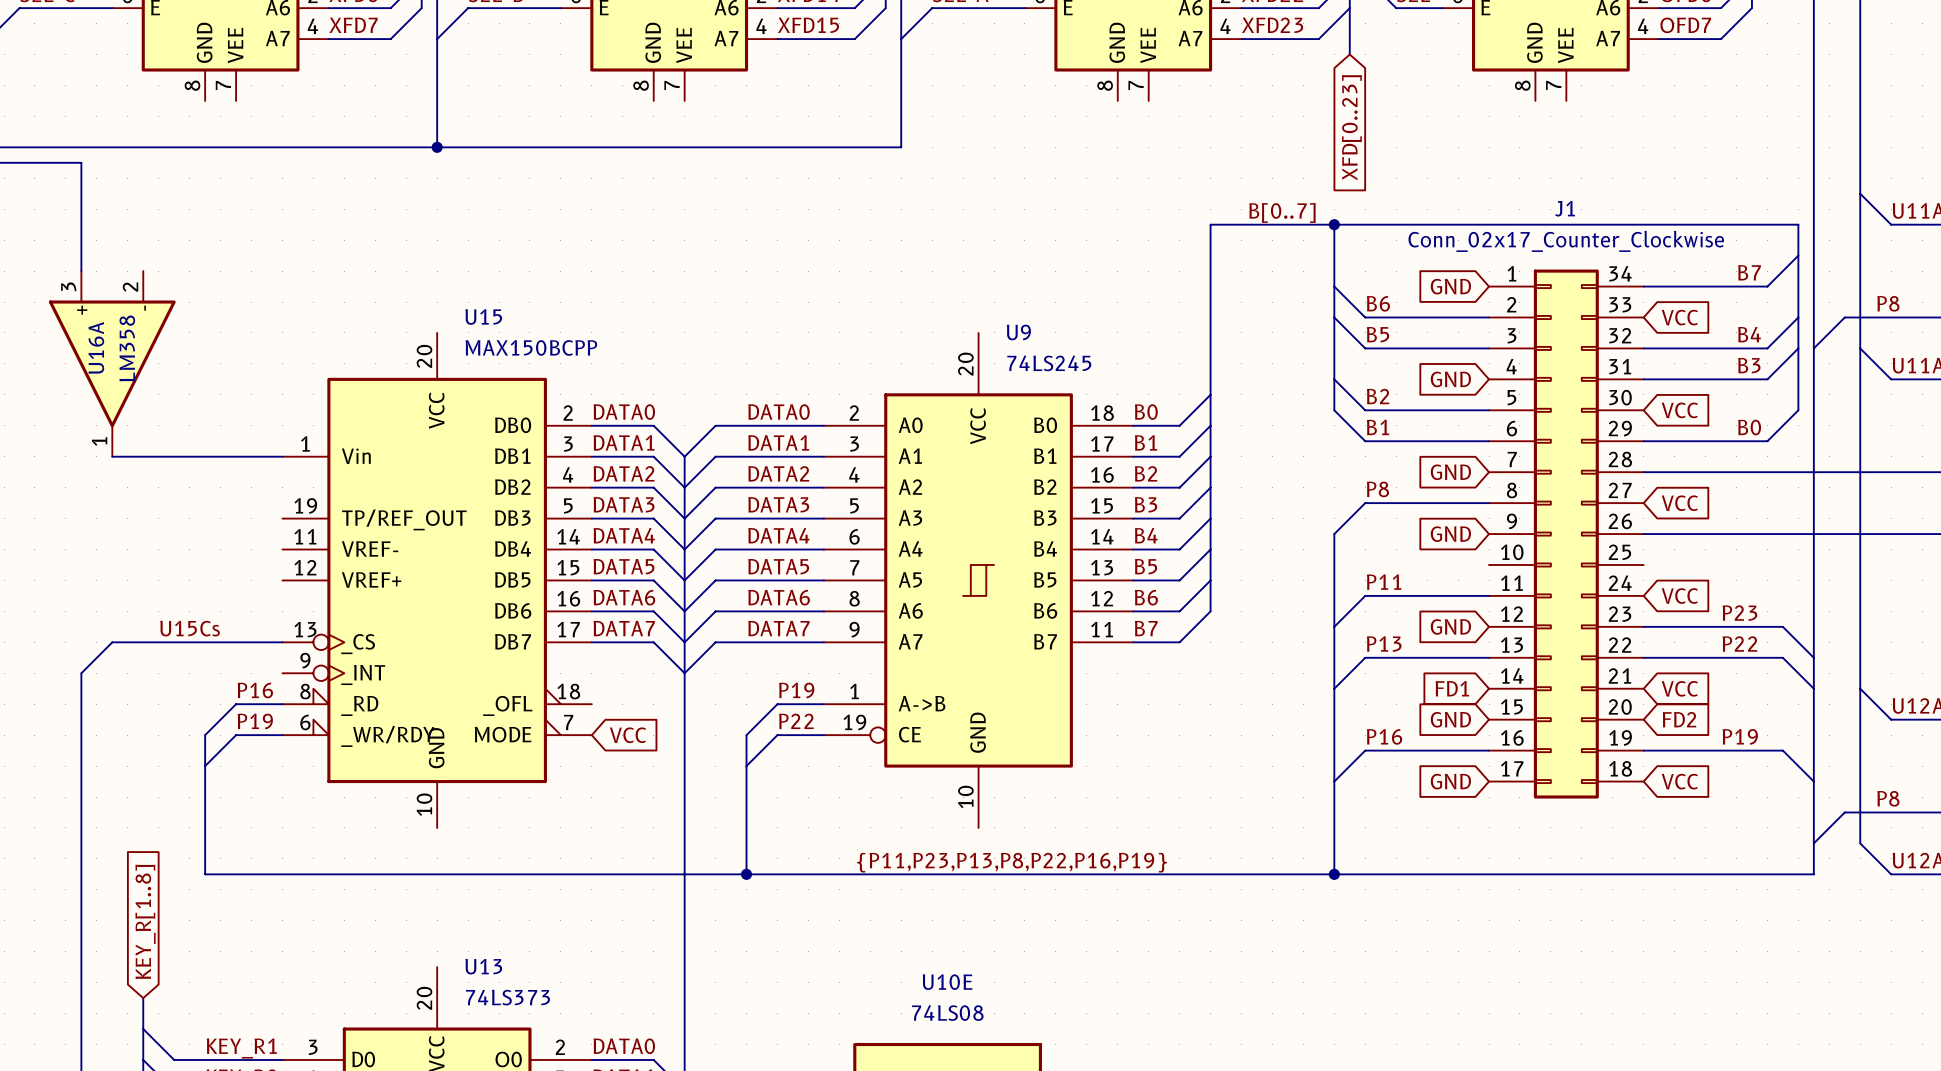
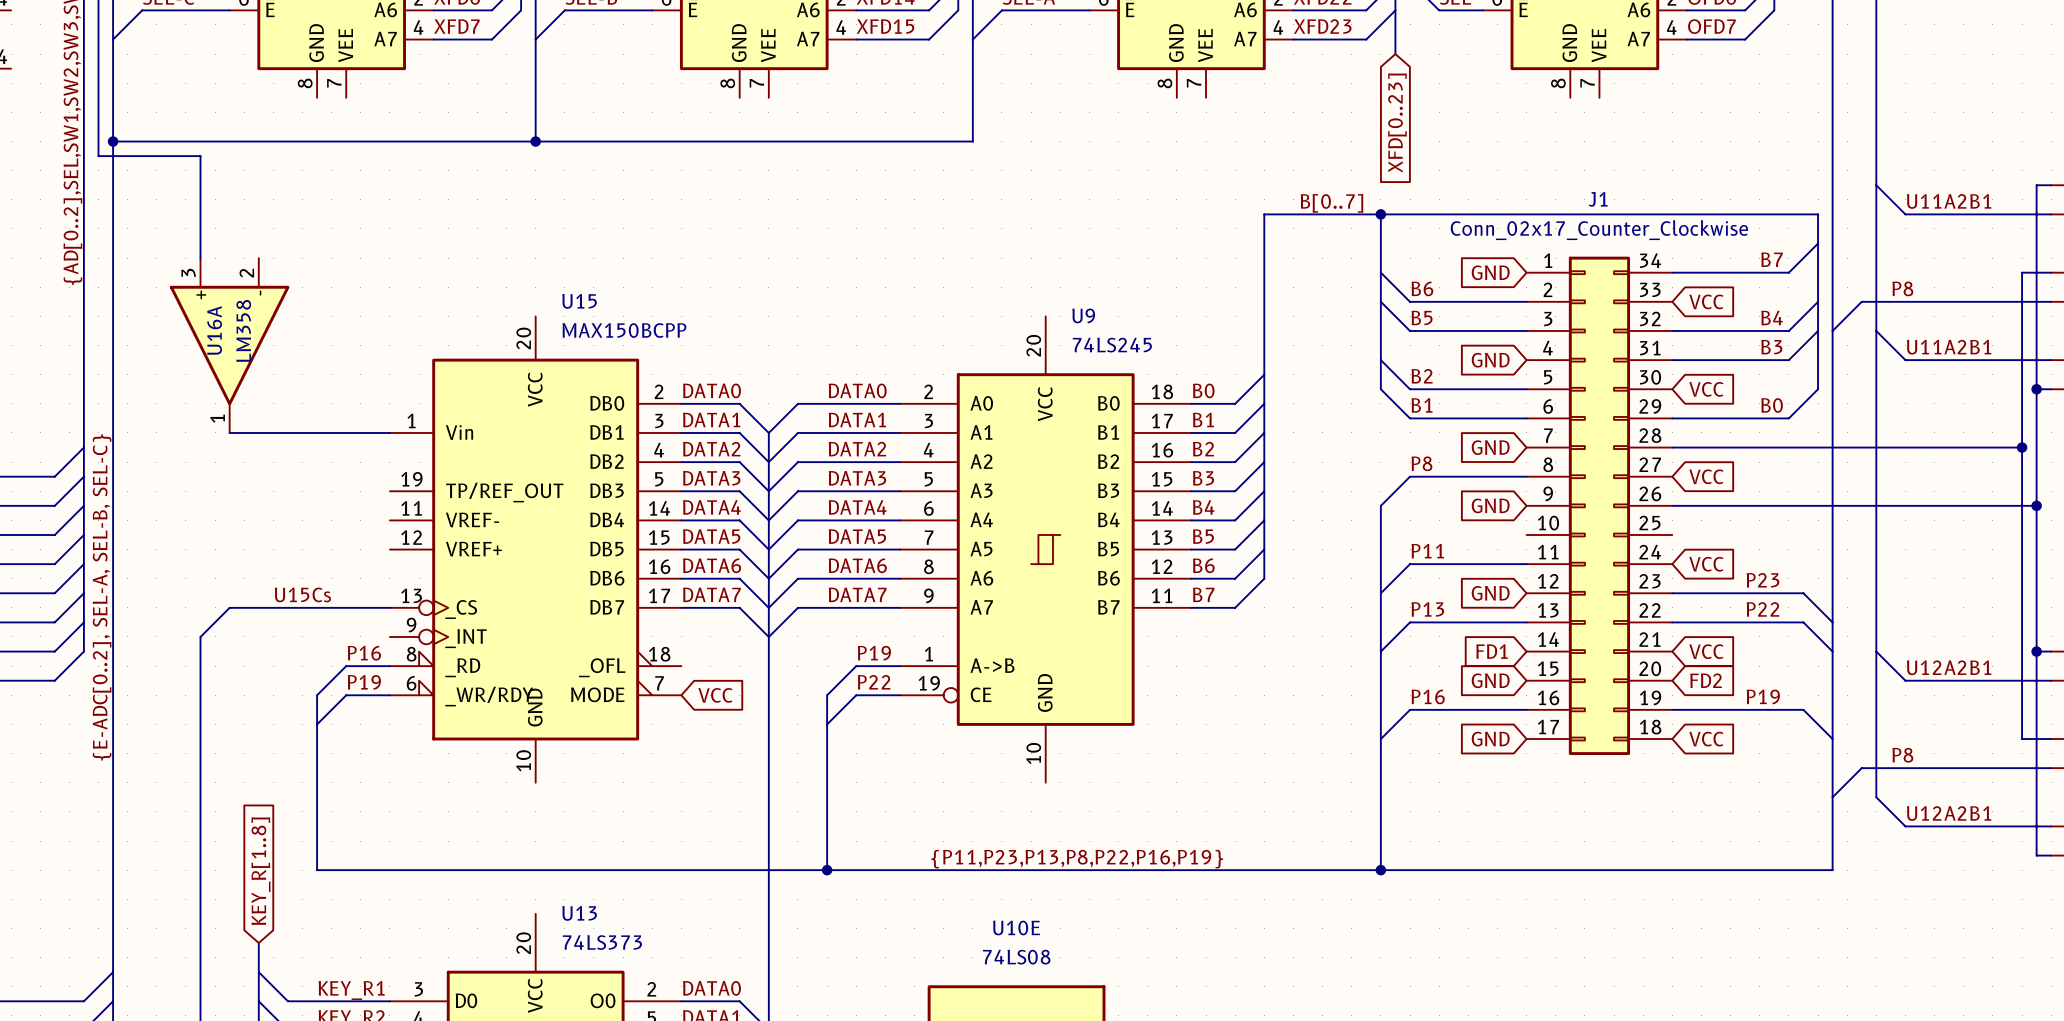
label position: {P11,P23,P13,P8,P22,P16,P19} (1012, 862) -> {P11,P23,P13,P8,P22,P16,P19} (1077, 859)
bus: (205, 874) (1813, 874) -> (317, 826) (317, 870) (1832, 870) (1832, 826)
bus: none -> (827, 826) (827, 870)
junction position: (746, 874) -> (827, 870)
bus: none -> (1380, 826) (1380, 870)
junction position: (1334, 874) -> (1380, 870)

